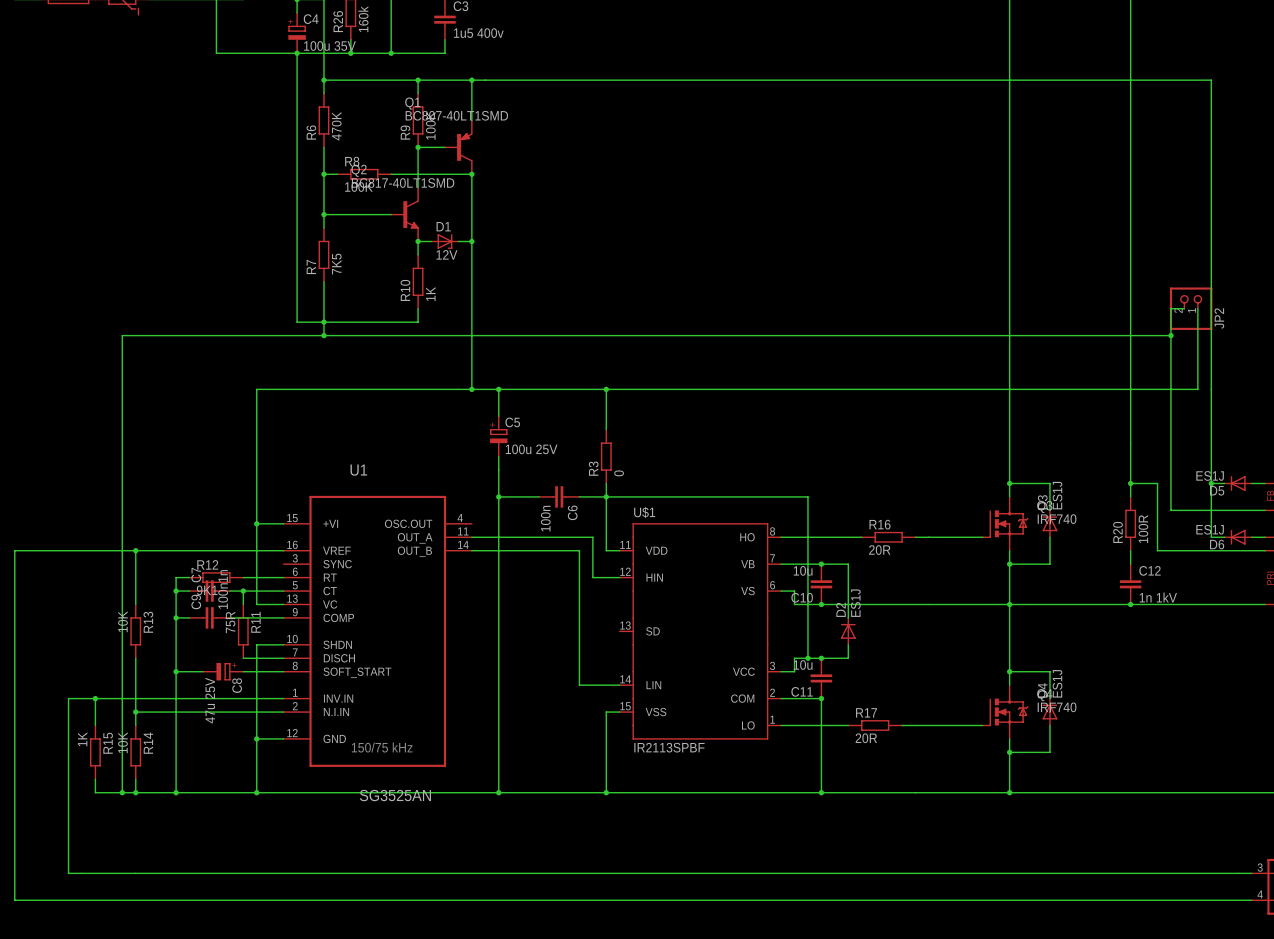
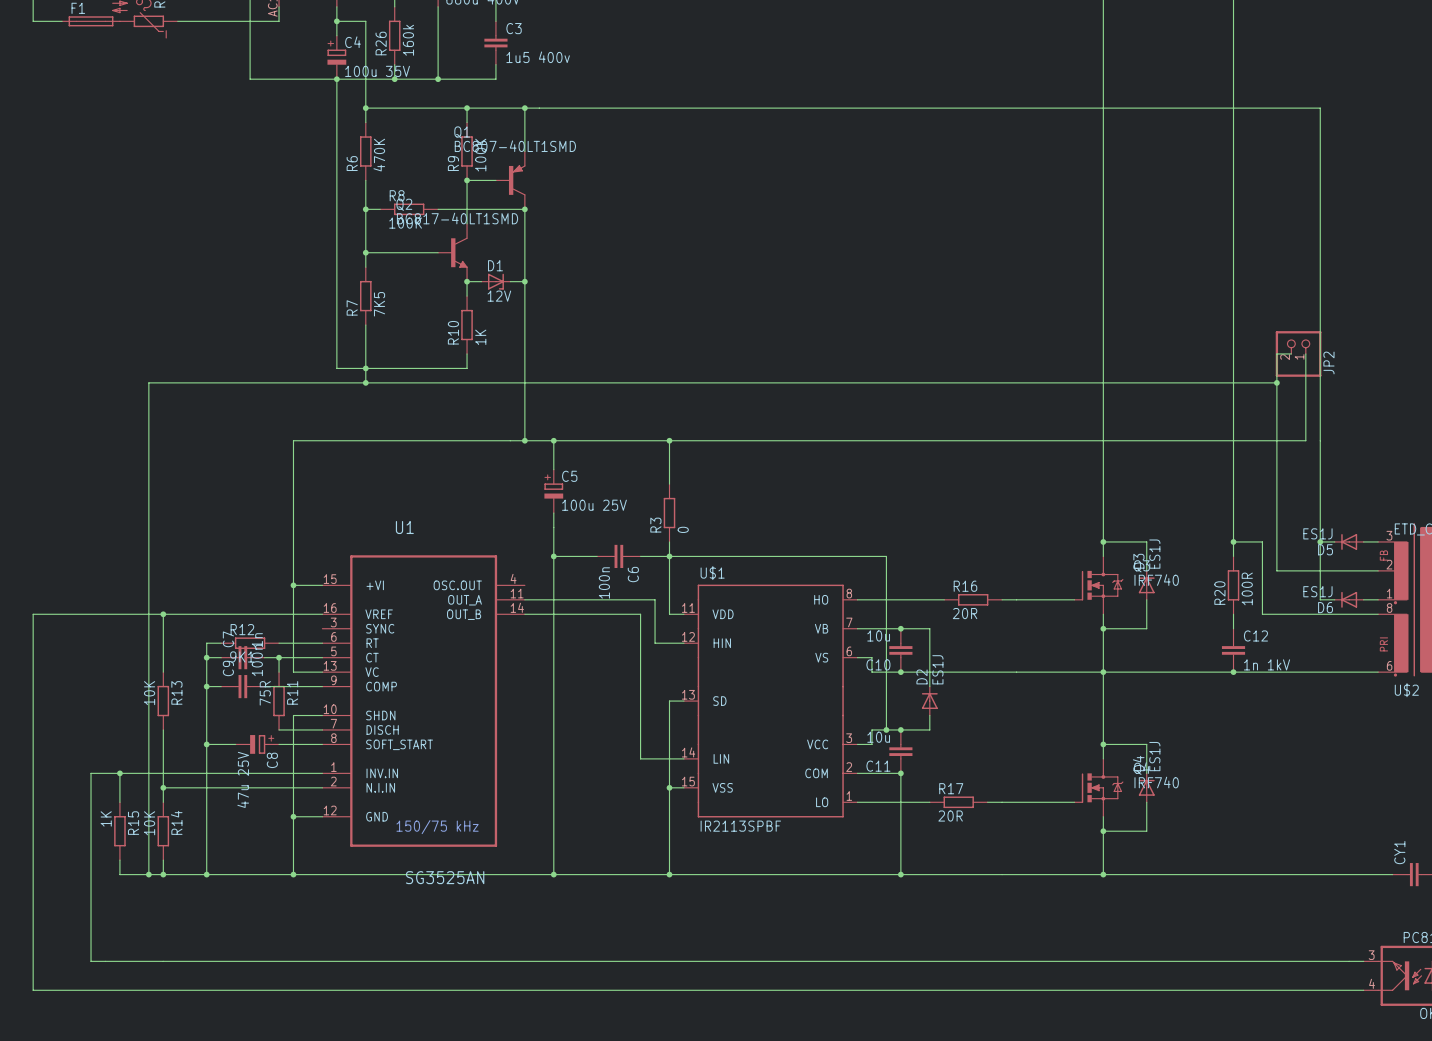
wire: none -> (683, 701) (669, 701) (669, 787)
junction: none -> (669, 787)

